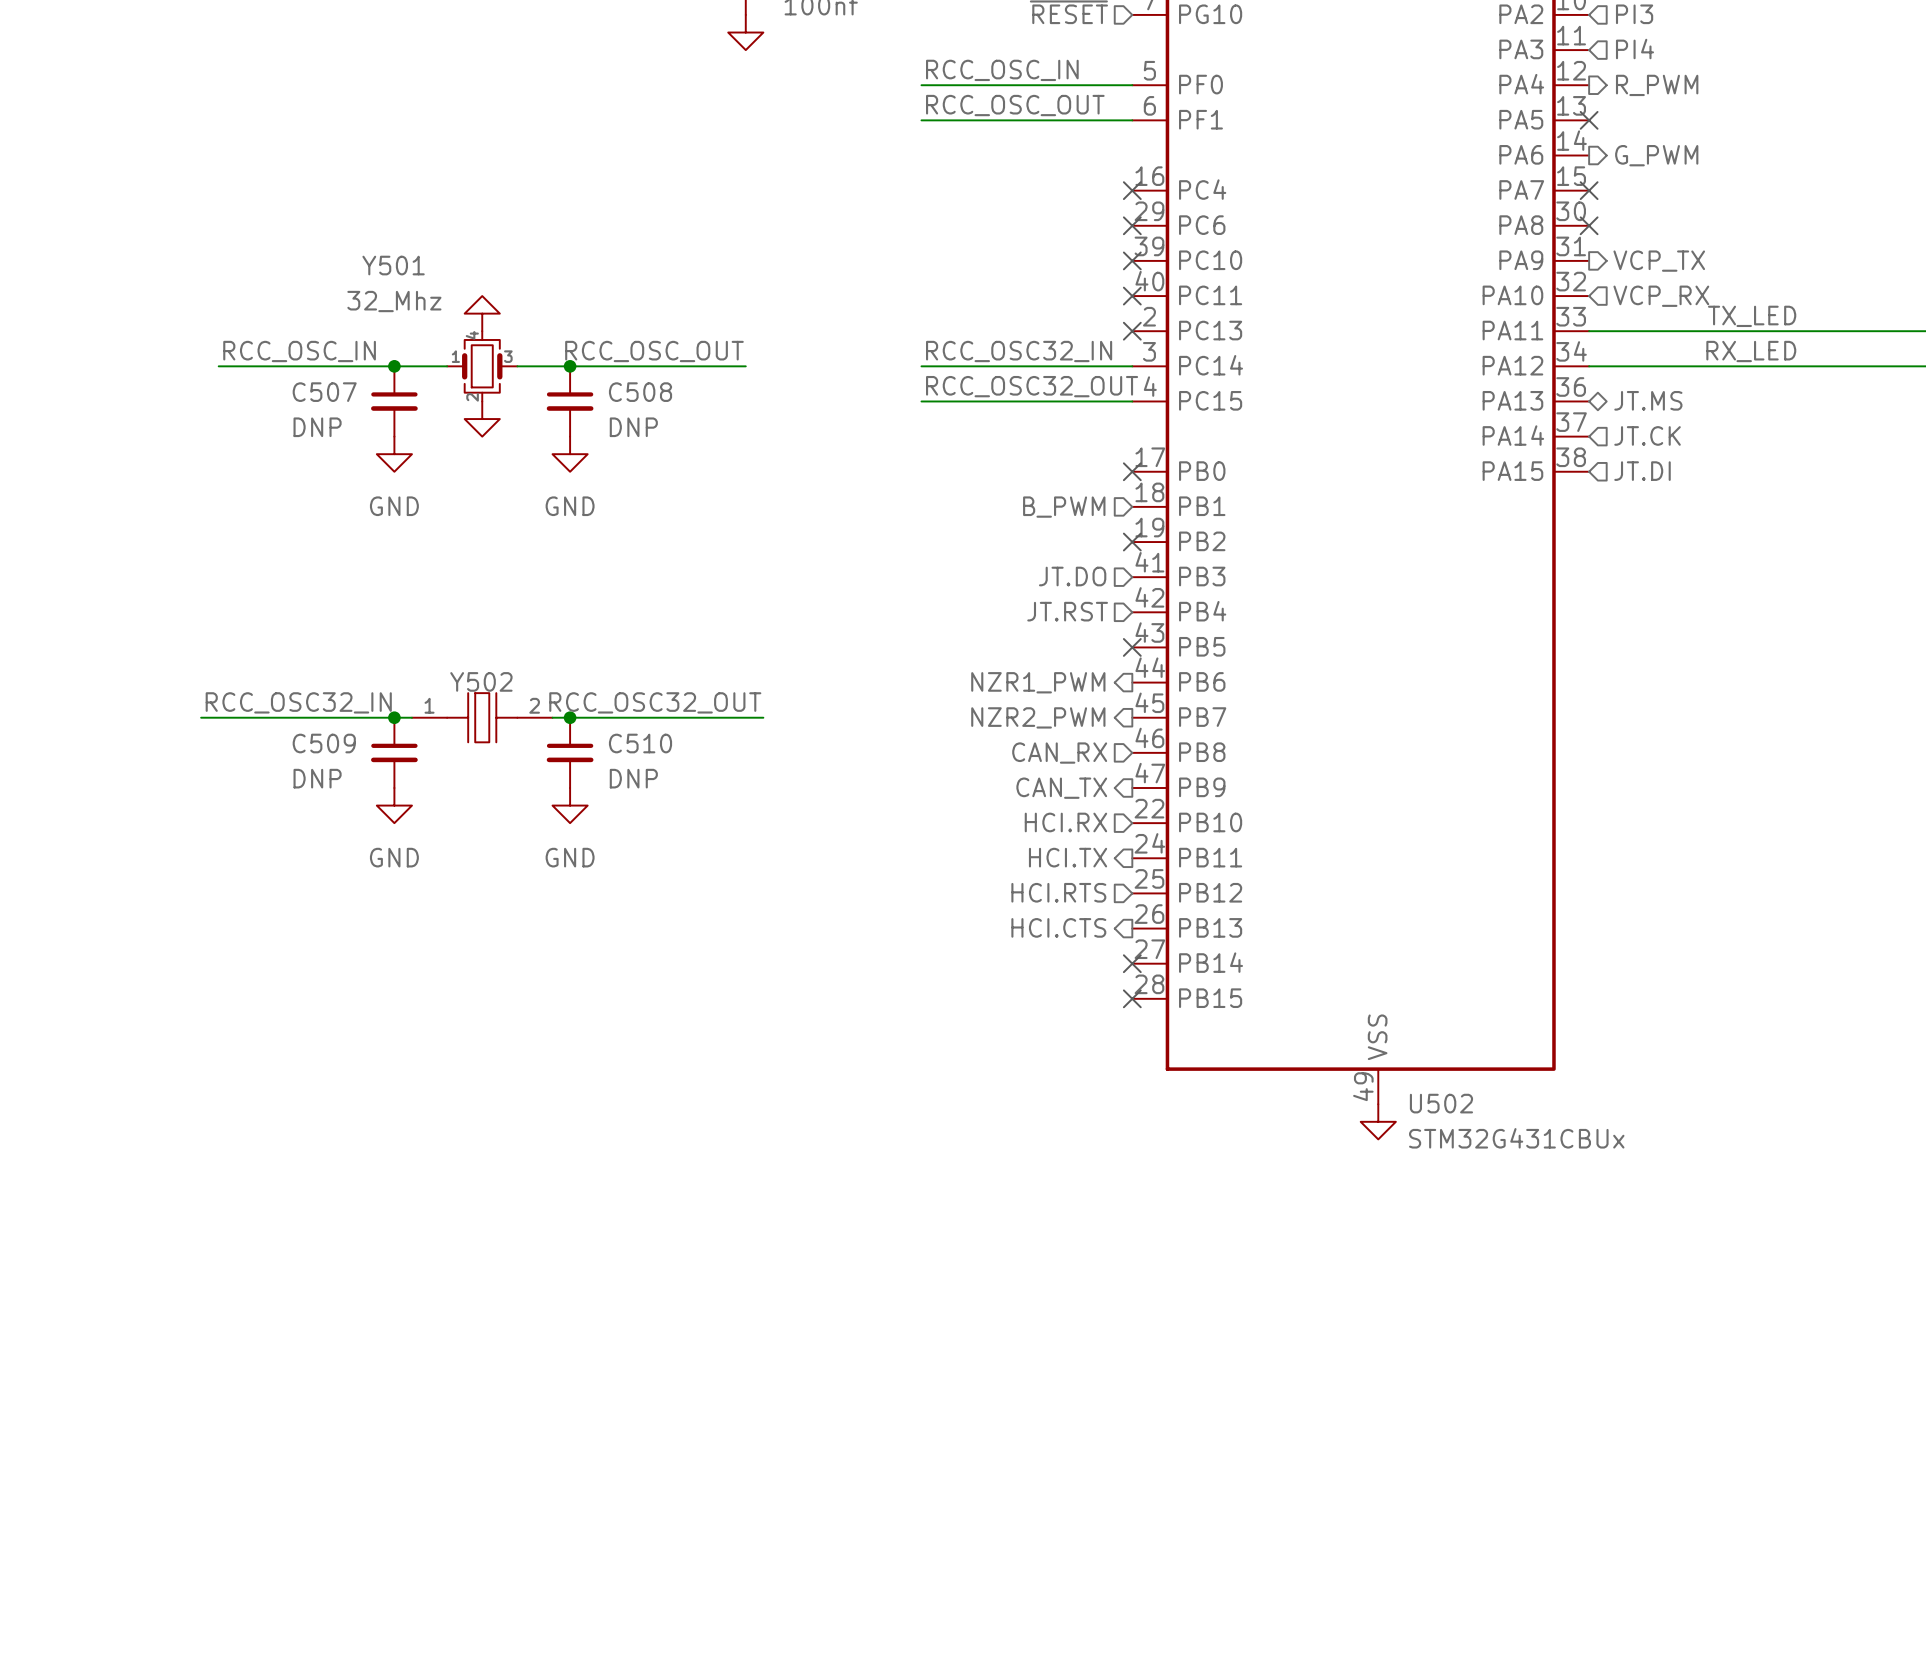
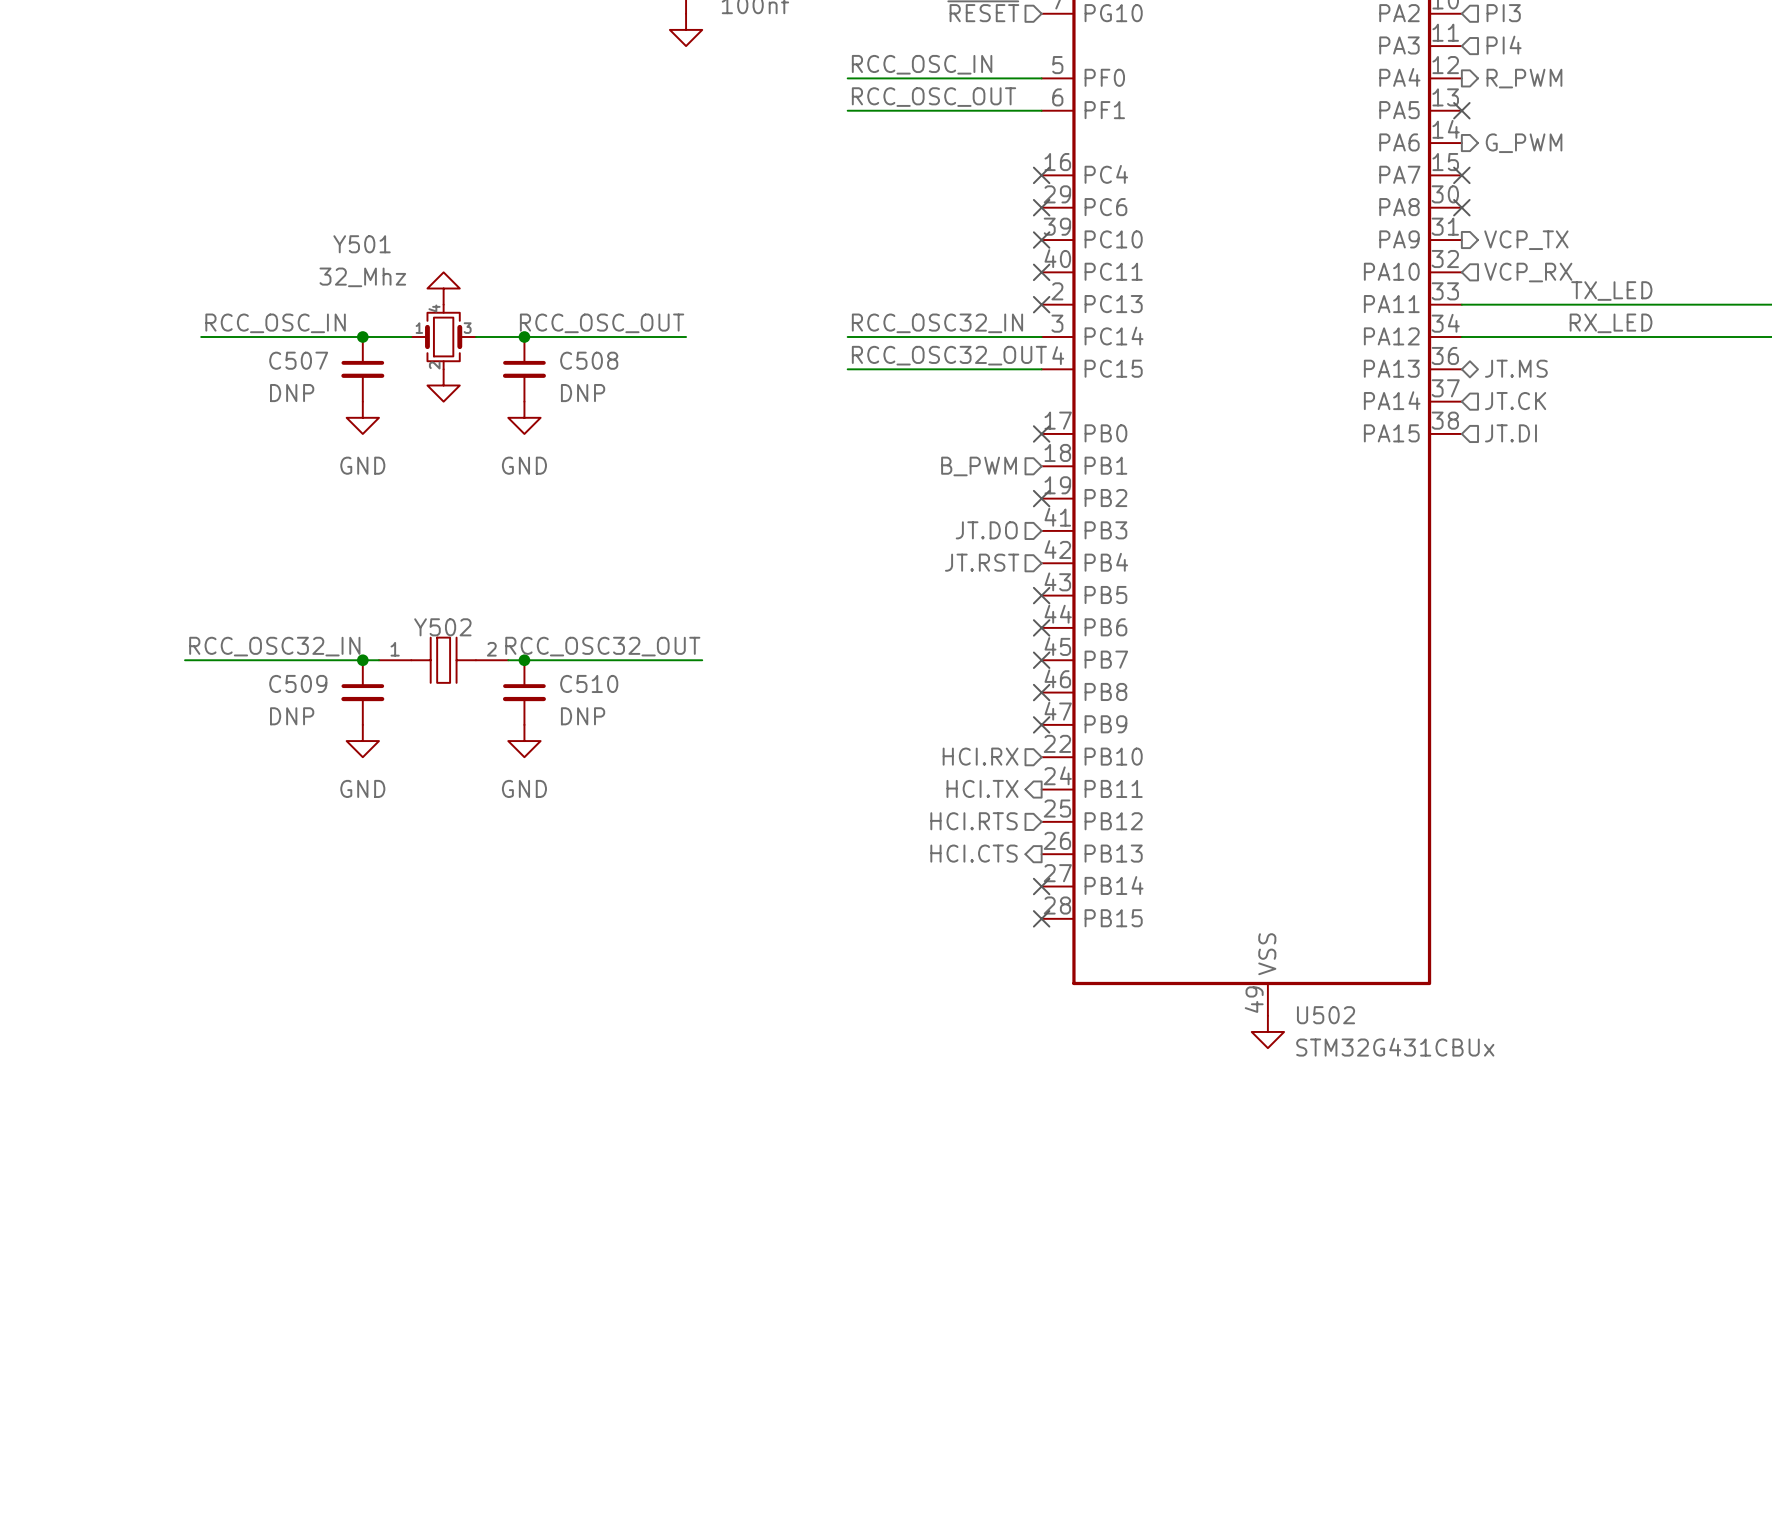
hierarchical label: NZR1_PWM (1038, 682) -> none
no-connect mark: none -> (1041, 627)
hierarchical label: NZR2_PWM (1038, 717) -> none
no-connect mark: none -> (1041, 660)
no-connect mark: none -> (1041, 692)
hierarchical label: CAN_RX (1059, 753) -> none
hierarchical label: CAN_TX (1061, 788) -> none
no-connect mark: none -> (1041, 724)

